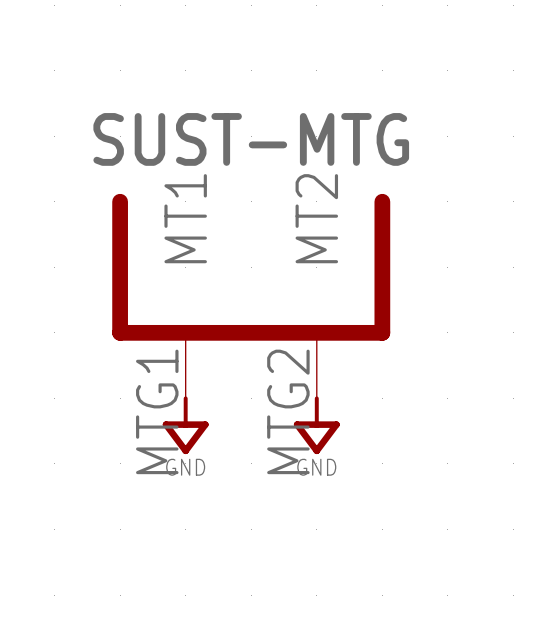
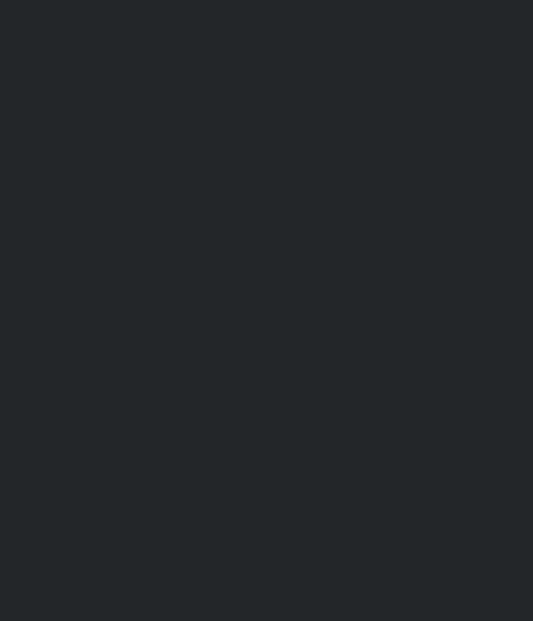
SUST-MTG: (251, 296) -> none
power symbol: GND (185, 425) -> none
power symbol: GND (316, 425) -> none

